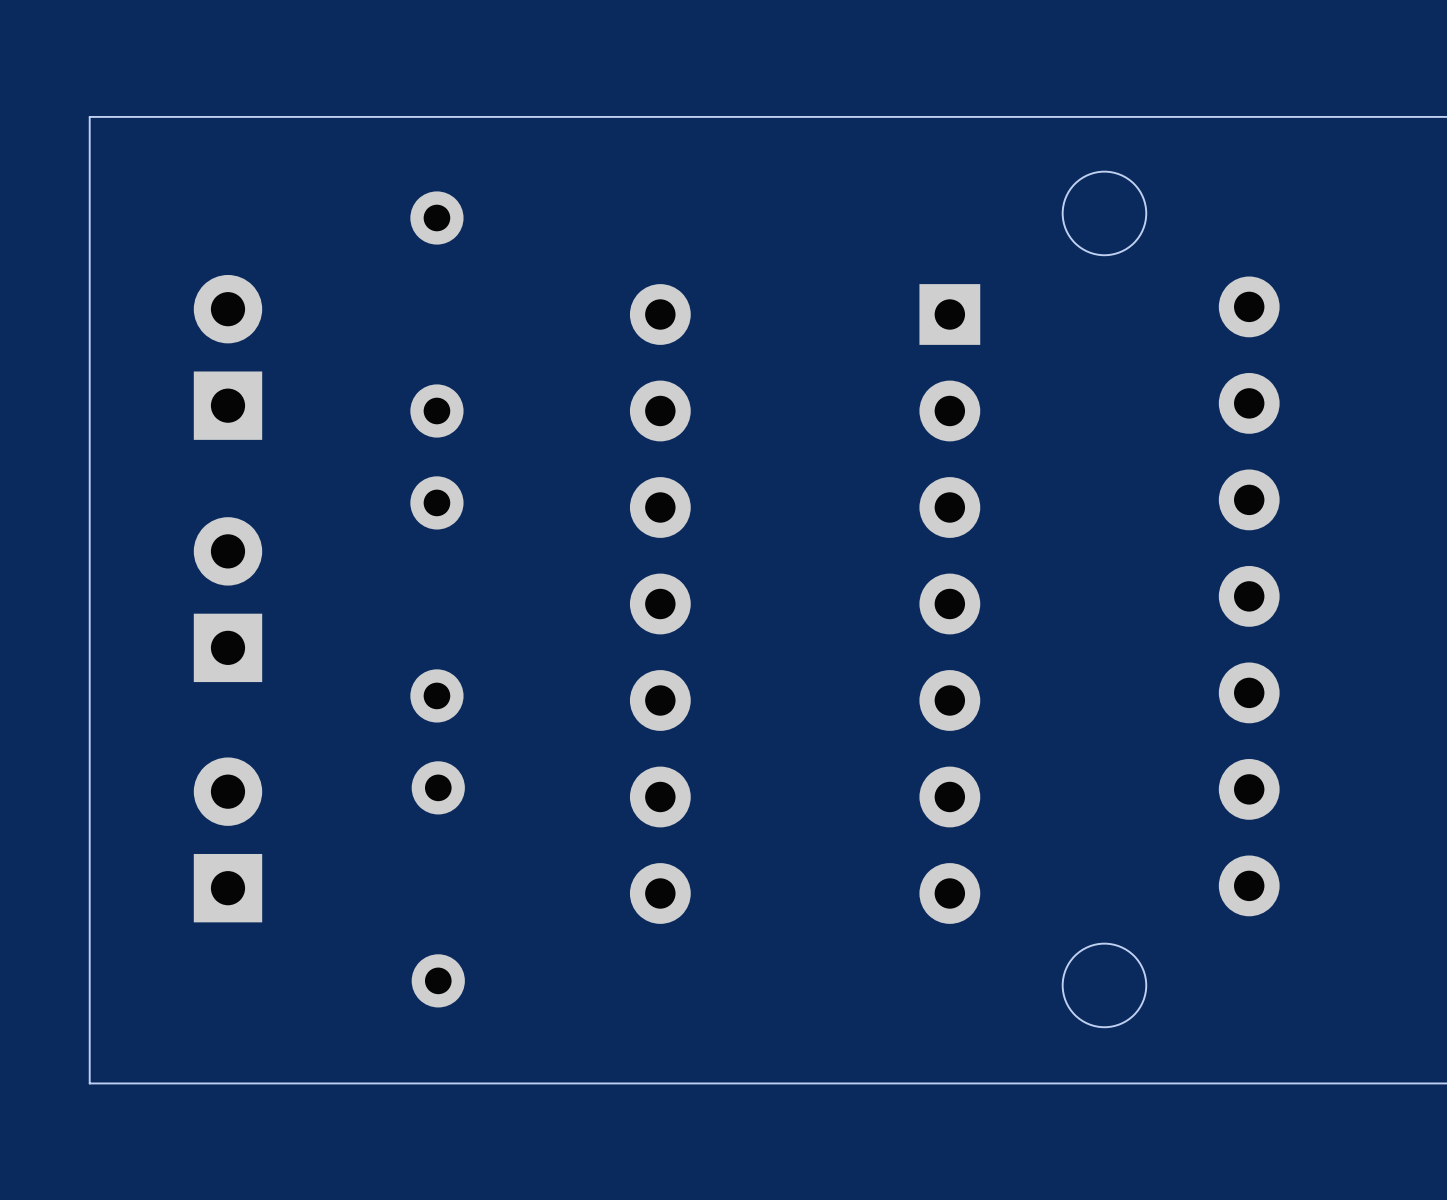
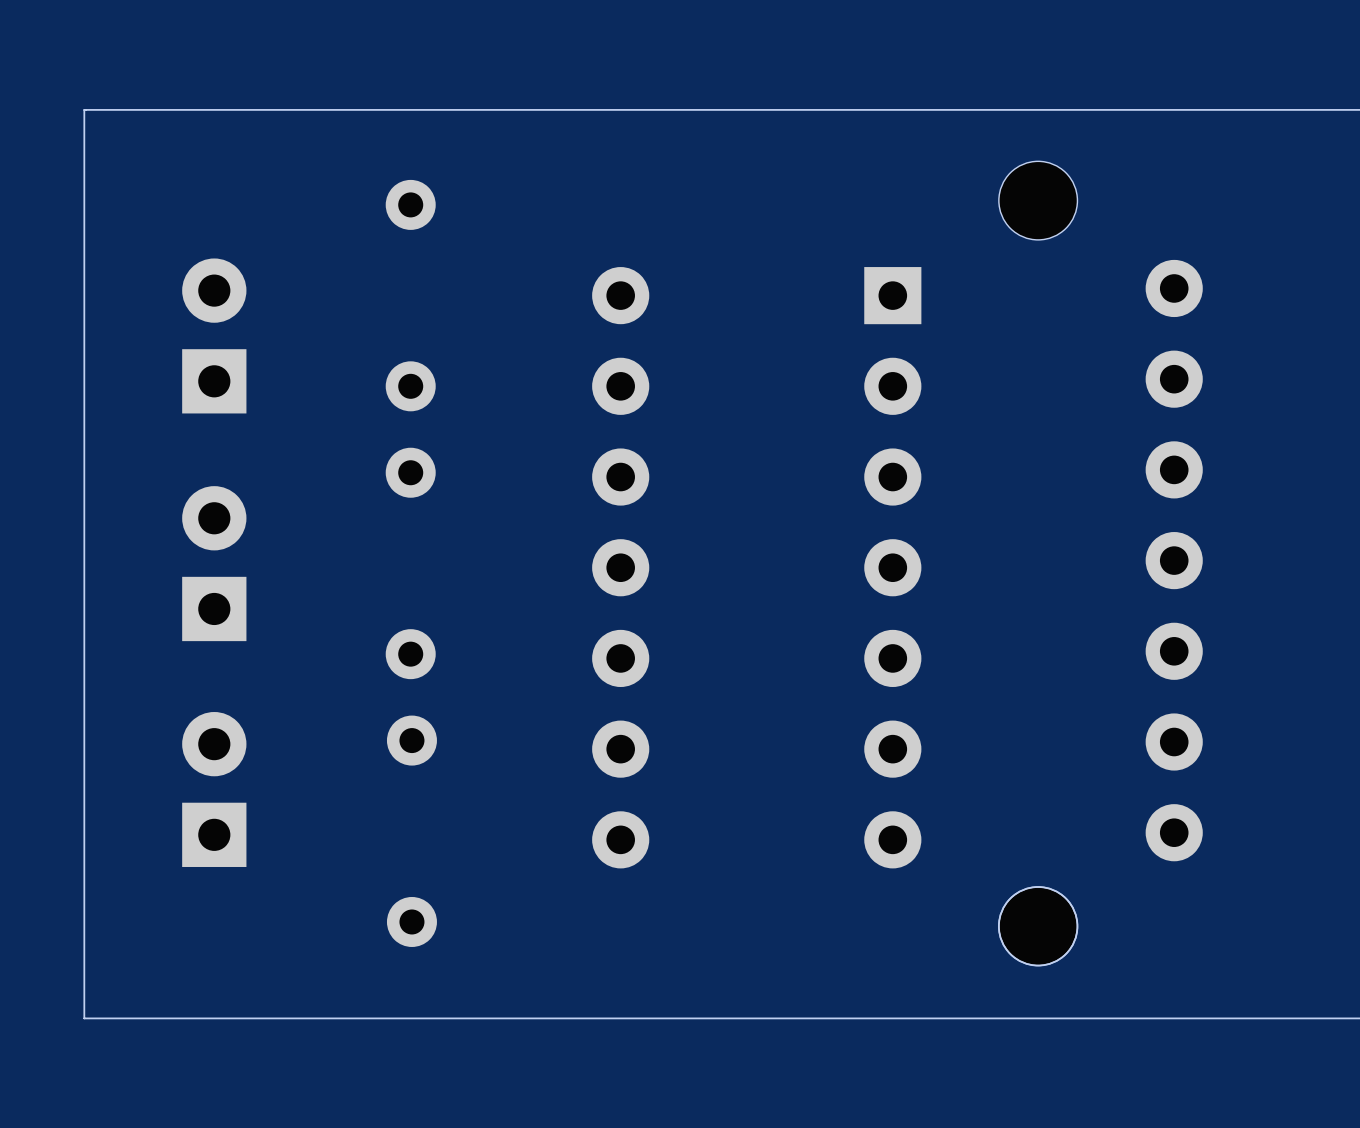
round board edge: [1061, 170, 1148, 257] -> none
part: none -> (1038, 200)
part: none -> (1038, 926)

